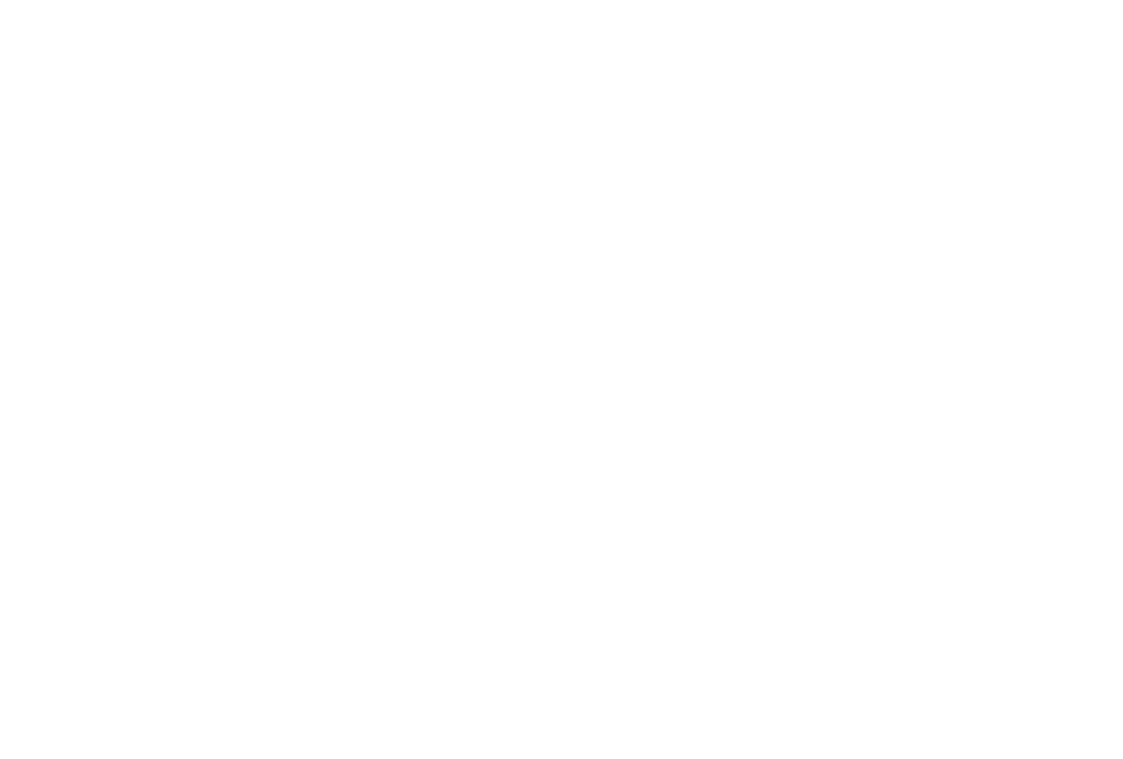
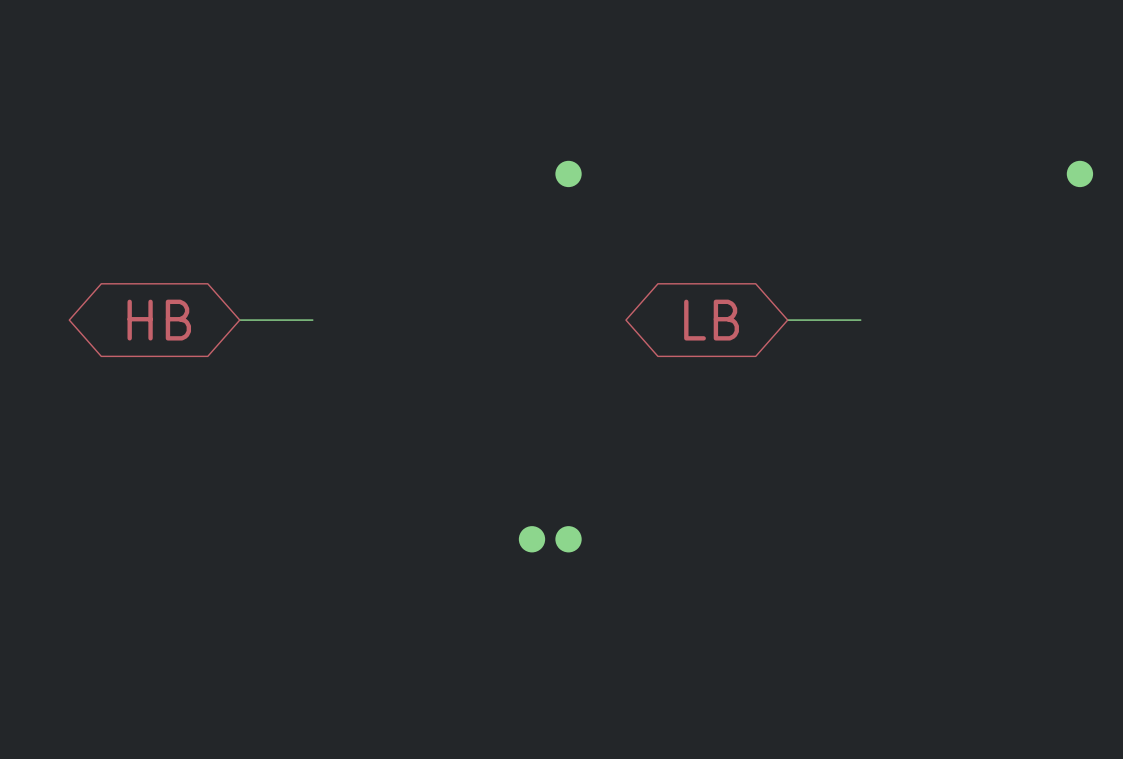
junction: none -> (568, 173)
junction: none -> (1079, 173)
global label: none -> HB (159, 320)
wire: none -> (239, 320) (312, 320)
global label: none -> LB (711, 320)
wire: none -> (787, 320) (860, 320)
junction: none -> (532, 539)
junction: none -> (568, 539)

